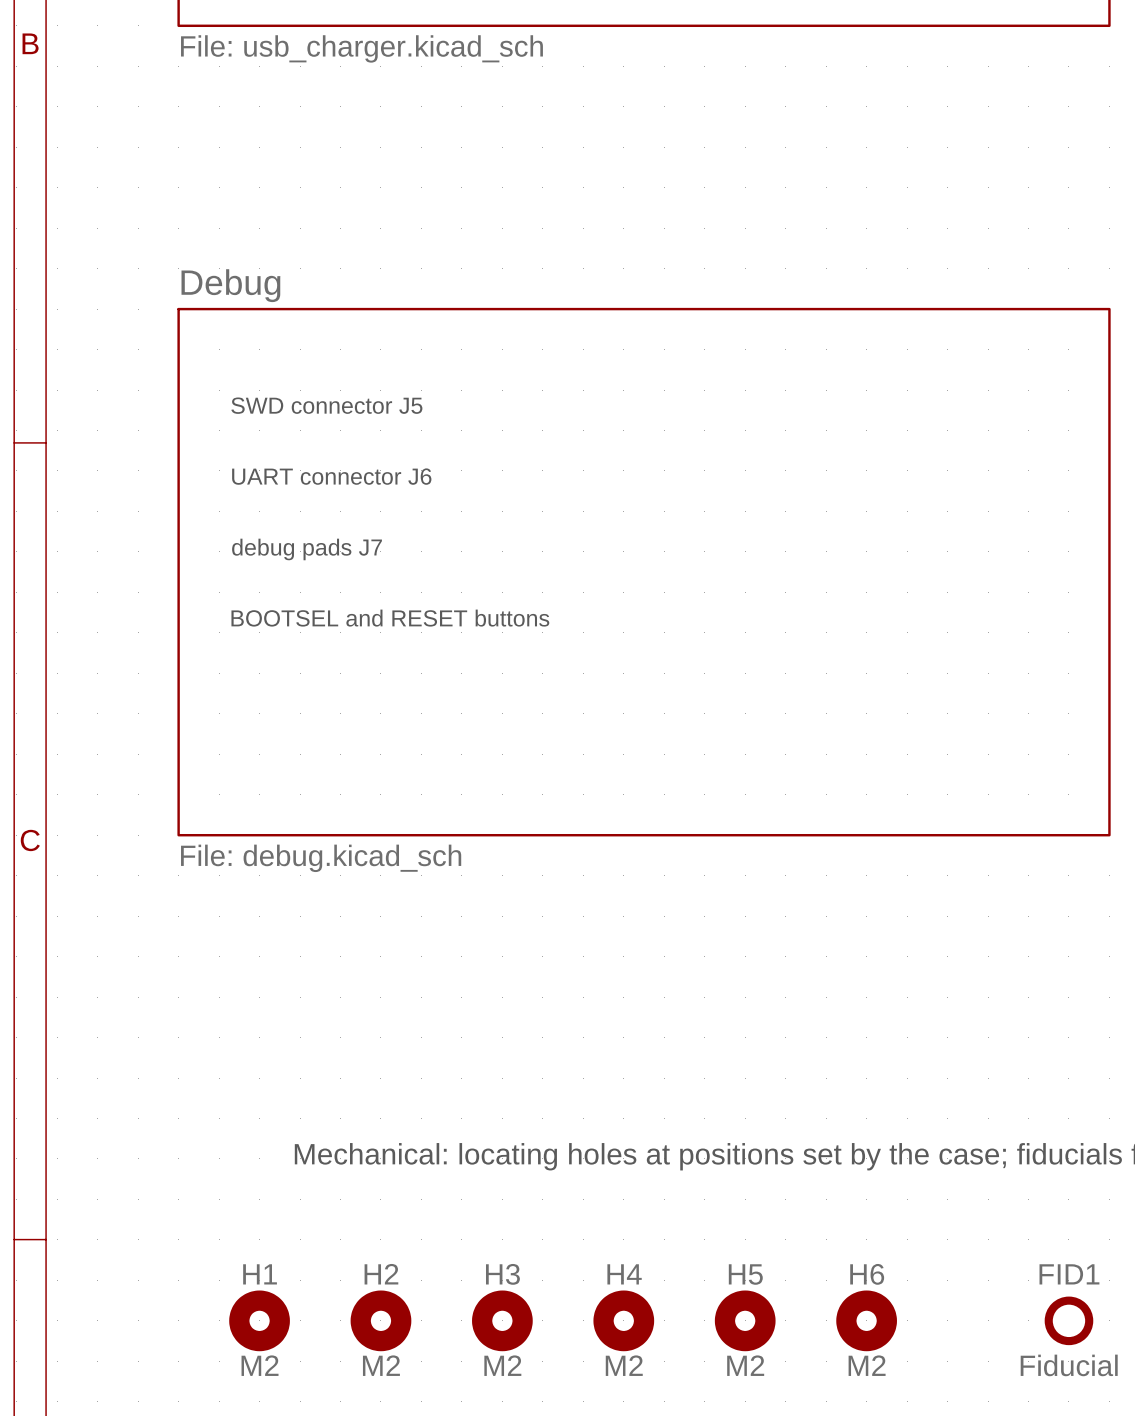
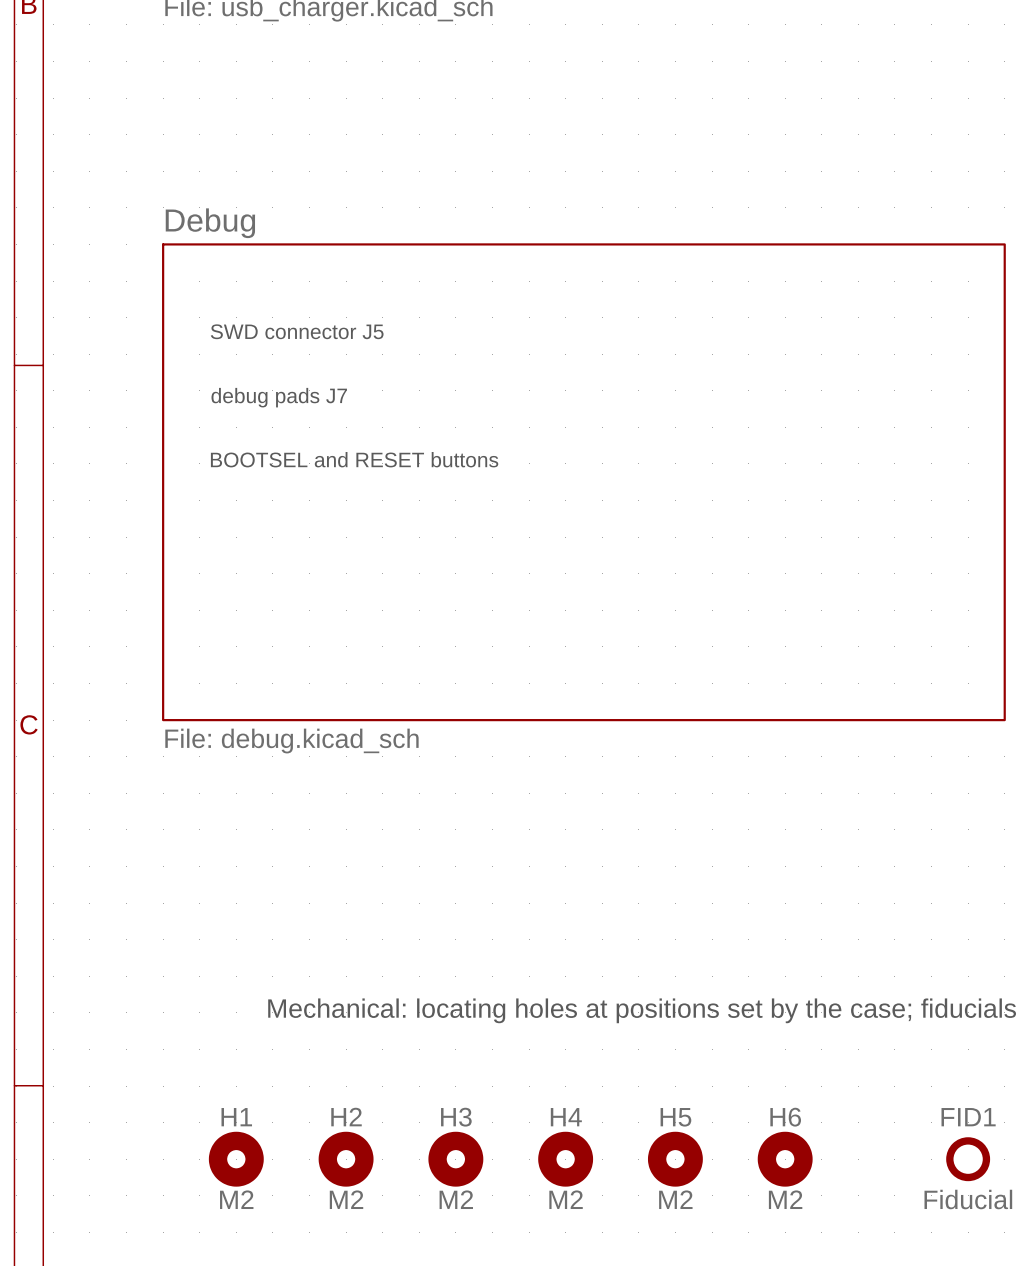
text: UART connector J6 (331, 476) -> none
text position: debug pads J7 (307, 549) -> debug pads J7 (279, 397)
text position: BOOTSEL and RESET buttons (390, 618) -> BOOTSEL and RESET buttons (354, 459)

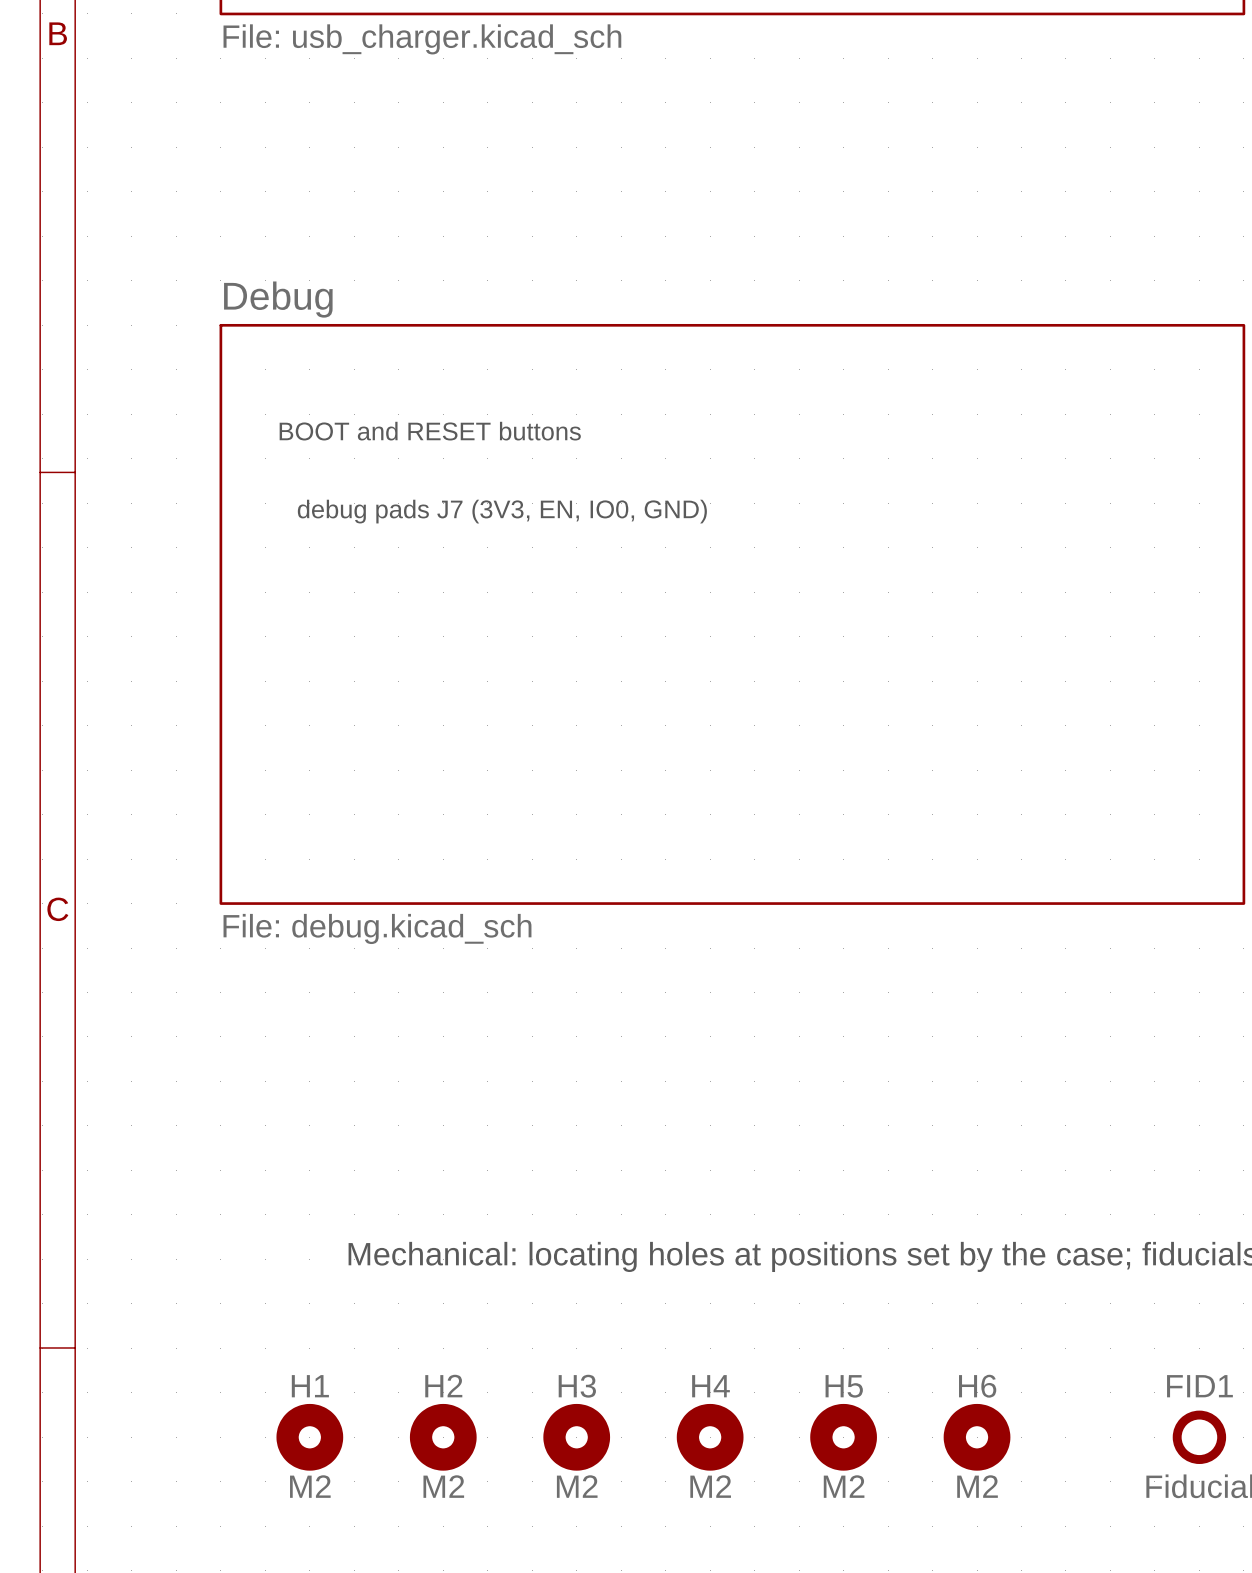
text: SWD connector J5 (297, 331) -> none
text: none -> BOOT and RESET buttons (430, 431)
text: debug pads J7 (279, 397) -> none
text: none -> debug pads J7 (3V3, EN, IO0, GND) (502, 511)
text: BOOTSEL and RESET buttons (354, 459) -> none

